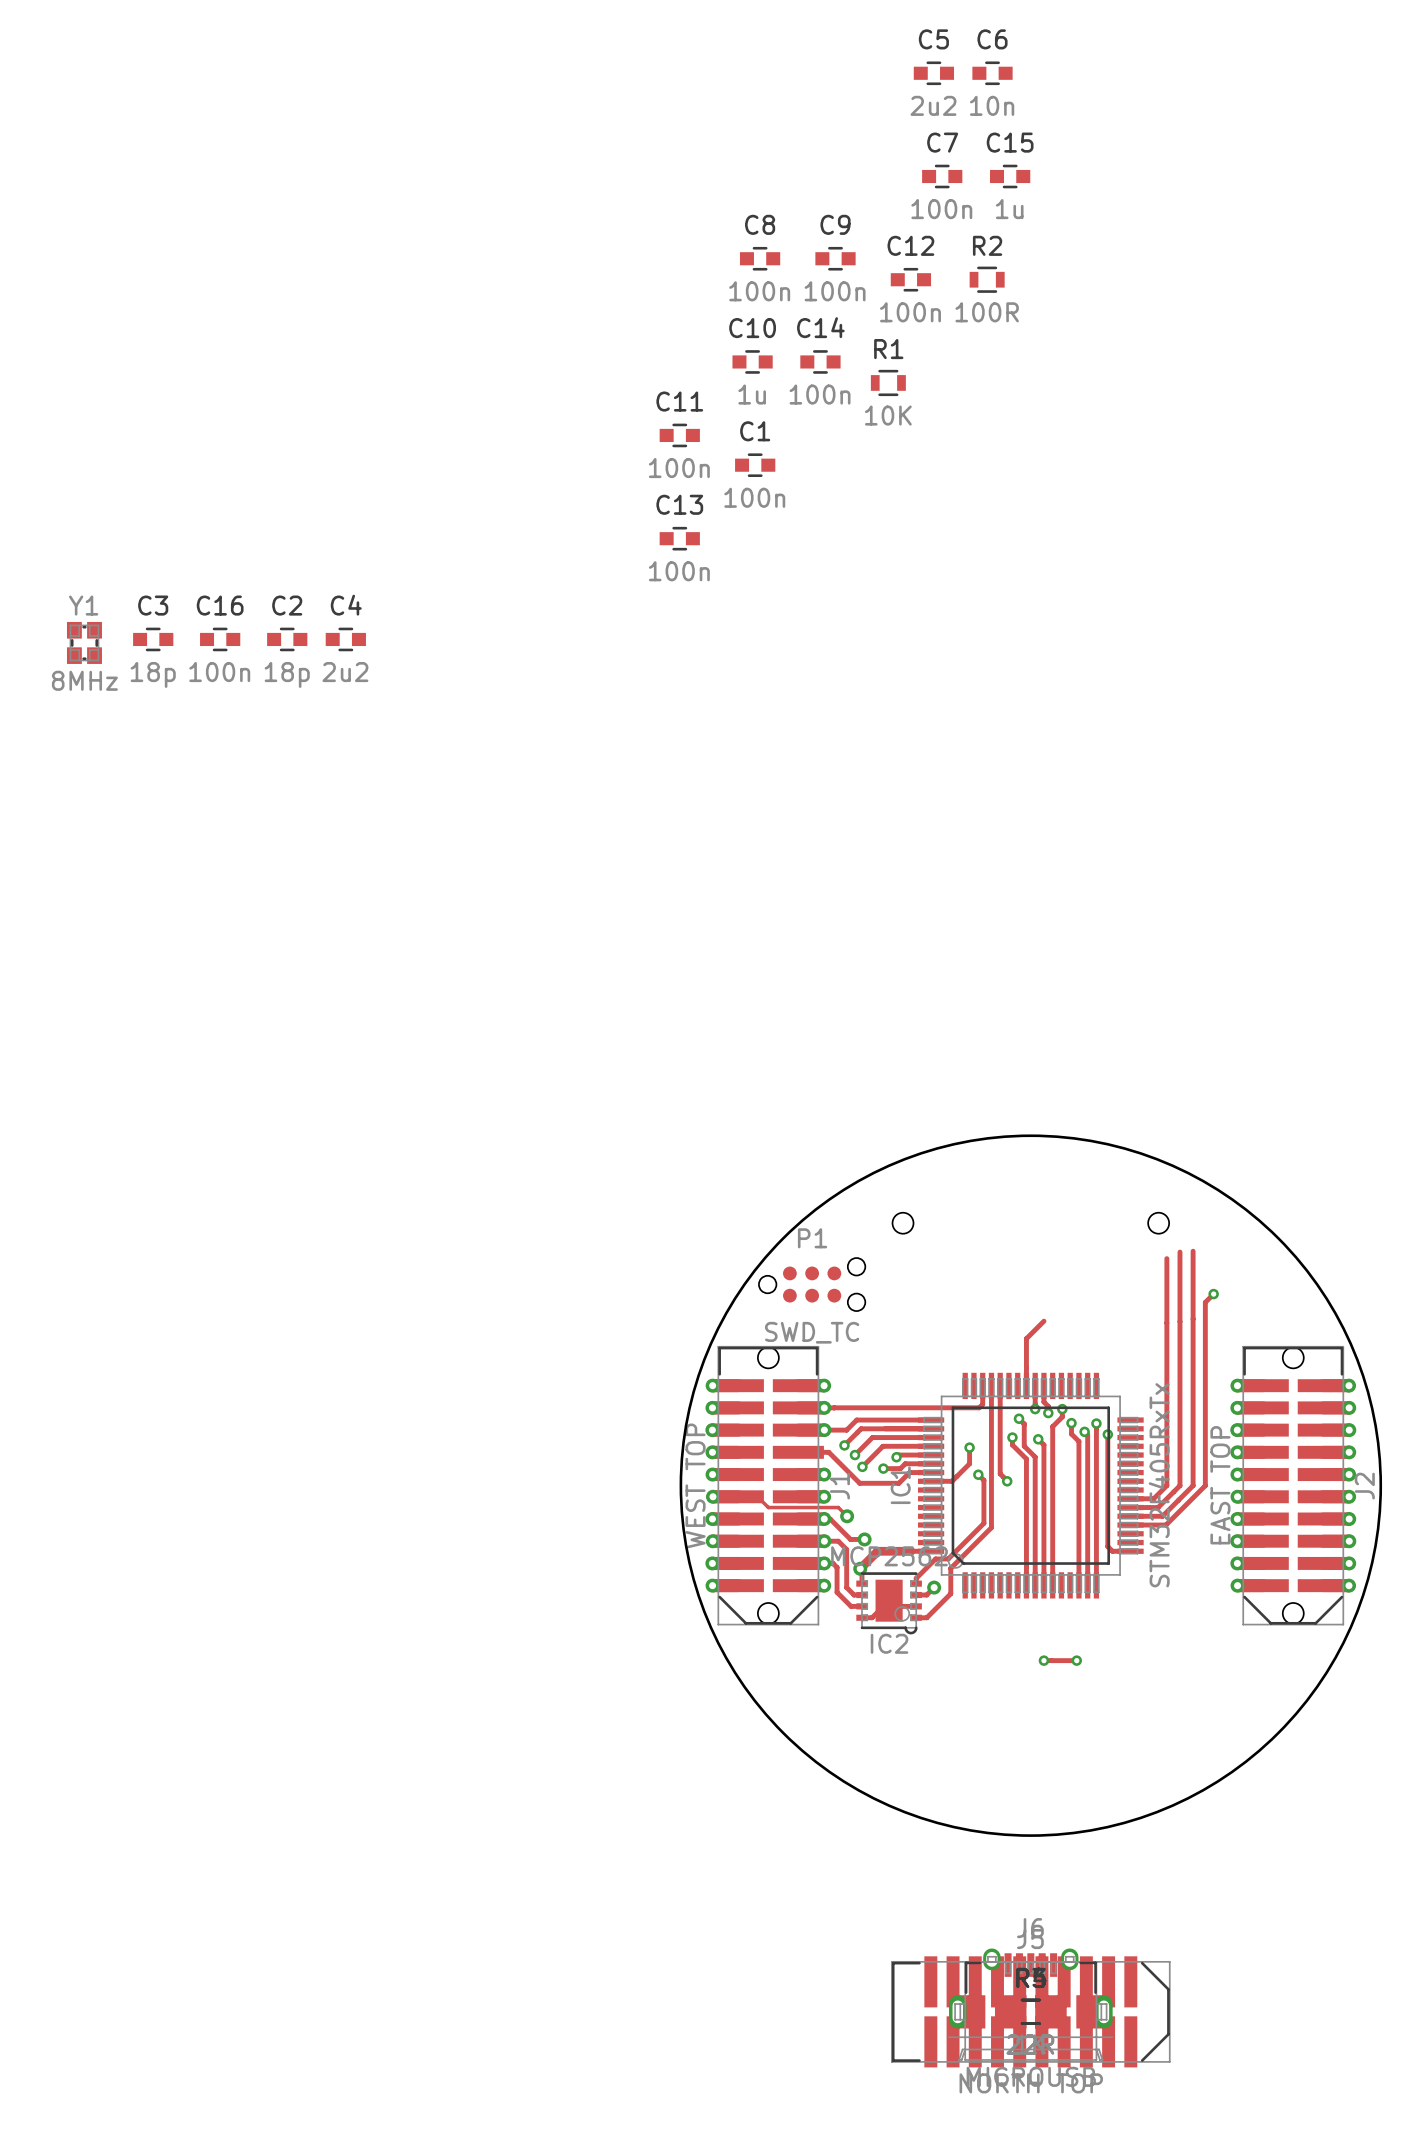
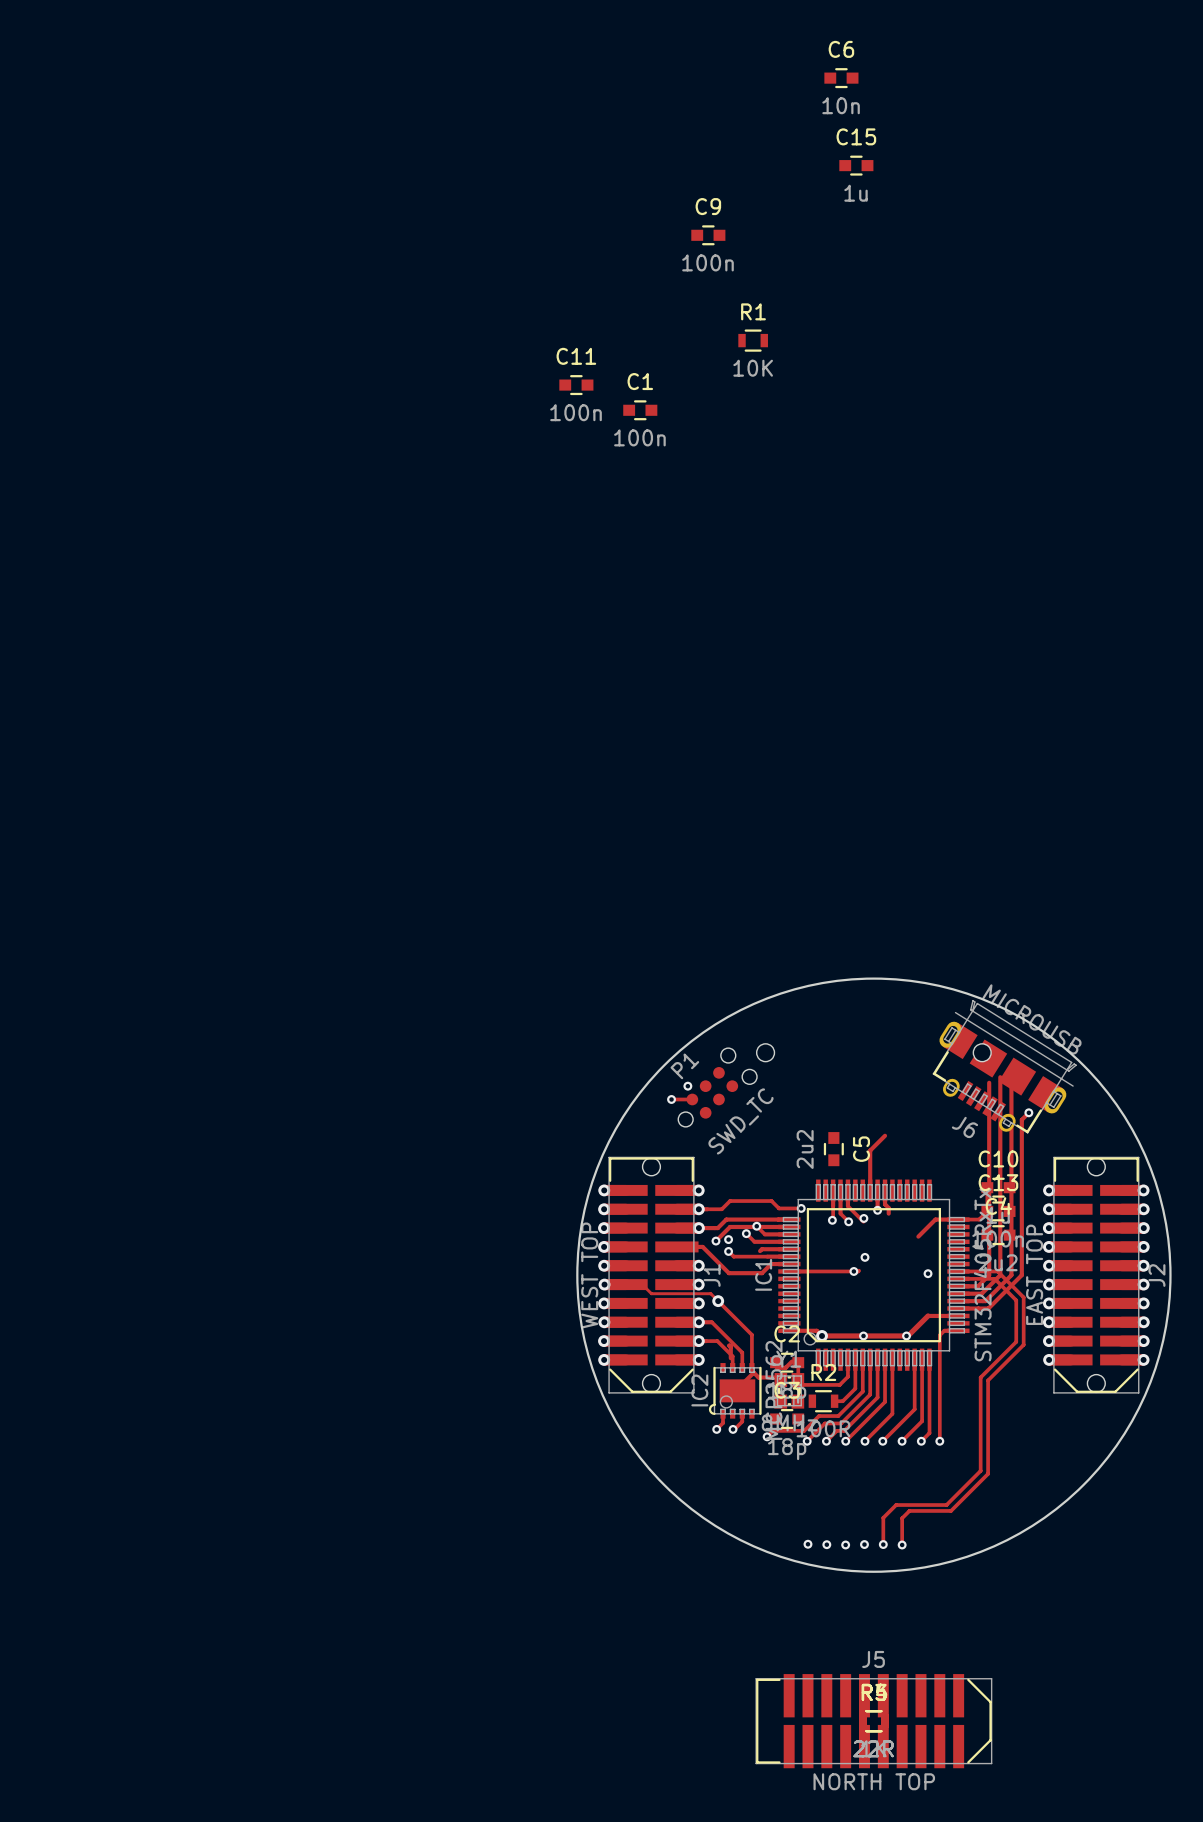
C5 rotation: 0° (933, 73) -> 90° clockwise (833, 1149)
C5 position: (933, 73) -> (833, 1149)
C7: 100n (942, 176) -> none
C8: 100n (760, 258) -> none
C12: 100n (910, 279) -> none
R2 position: (987, 279) -> (823, 1401)
C10 position: (752, 361) -> (998, 1187)
C14: 100n (820, 361) -> none
C13 position: (679, 538) -> (998, 1211)
C3 position: (153, 639) -> (787, 1419)
C16: 100n (220, 639) -> none
C2 position: (287, 639) -> (787, 1362)
C4 position: (345, 639) -> (998, 1235)
Y1 position: (84, 642) -> (789, 1390)
via: none -> (687, 1086)
track: none -> (671, 1099) (692, 1099)
via: none -> (671, 1099)
P1 rotation: 0° (812, 1284) -> 45° counterclockwise (717, 1087)
track: none -> (987, 1187) (987, 1211) (979, 1219) (935, 1219) (918, 1236)
track: (982, 1404) (979, 1407) (834, 1407) -> (801, 1208) (778, 1208) (771, 1201) (730, 1201) (721, 1209) (707, 1209)
track: none -> (833, 1206) (832, 1220)
track: (1000, 1404) (1000, 1473) (1007, 1481) -> (847, 1206) (863, 1221)
via: none -> (801, 1208)
track: (1062, 1409) (1062, 1417) (1052, 1426) (1052, 1585) -> (865, 1441) (892, 1413) (892, 1359)
via: (1062, 1409) -> none
track: (991, 1413) (991, 1527) (950, 1568) (950, 1593) (926, 1617) (916, 1617) -> (840, 1213) (848, 1221)
via: (1048, 1413) -> none
track: (1019, 1418) (1024, 1423) (1024, 1446) (1035, 1457) (1035, 1585) -> (826, 1441) (836, 1430) (844, 1430) (877, 1397) (877, 1359)
via: none -> (832, 1220)
via: none -> (848, 1221)
track: (1071, 1423) (1071, 1434) (1078, 1441) (1078, 1585) -> (882, 1441) (914, 1409) (914, 1359)
via: (1071, 1423) -> none
track: (1096, 1423) (1096, 1585) -> (921, 1441) (929, 1433) (929, 1359)
via: (1096, 1423) -> none
via: none -> (756, 1226)
track: (1084, 1431) (1087, 1434) (1087, 1585) -> (902, 1441) (922, 1421) (922, 1359)
via: (1084, 1431) -> none
track: (1107, 1434) (1107, 1546) (1113, 1551) -> (939, 1441) (939, 1335) (944, 1330)
via: (1107, 1434) -> none
via: none -> (746, 1233)
track: (902, 1437) (872, 1437) (854, 1455) -> (764, 1234) (756, 1226)
track: (1012, 1437) (1012, 1444) (1026, 1458) (1026, 1585) -> (807, 1441) (824, 1423) (841, 1423) (870, 1394) (870, 1359)
via: (1012, 1437) -> none
track: (1038, 1439) (1043, 1444) (1043, 1585) -> (845, 1441) (885, 1401) (885, 1359)
via: (1038, 1439) -> none
via: none -> (728, 1239)
track: (889, 1446) (882, 1446) (862, 1466) -> (754, 1241) (746, 1233)
track: (969, 1447) (969, 1463) (952, 1481) -> (859, 1270) (807, 1271)
via: (969, 1447) -> none
via: (854, 1455) -> none
via: none -> (728, 1251)
via: (896, 1457) -> none
track: (905, 1463) (900, 1468) (883, 1468) -> (767, 1256) (733, 1256) (728, 1251)
via: none -> (865, 1257)
via: (862, 1466) -> none
via: (883, 1468) -> none
track: (978, 1474) (983, 1480) (983, 1523) (948, 1558) (935, 1558) (916, 1578) (916, 1583) (918, 1583) -> none
via: (978, 1474) -> none
track: none -> (958, 1271) (997, 1271) (1023, 1297) (1023, 1344) (988, 1380) (988, 1473) (951, 1510) (909, 1510) (902, 1518) (902, 1544)
via: none -> (928, 1273)
track: none -> (958, 1278) (994, 1278) (1016, 1300) (1016, 1341) (980, 1377) (980, 1470) (946, 1505) (896, 1505) (883, 1517) (883, 1544)
track: (826, 1518) (830, 1518) (850, 1539) (864, 1539) -> none
track: none -> (715, 1303) (718, 1301) (751, 1334) (751, 1367)
via: (864, 1539) -> none
track: (838, 1541) (846, 1549) (846, 1587) (854, 1595) (861, 1595) -> (710, 1322) (742, 1352) (742, 1367)
track: (931, 1551) (877, 1551) (860, 1568) -> (789, 1330) (816, 1330) (822, 1335) (907, 1336) (928, 1315) (958, 1315)
via: none -> (863, 1335)
via: none -> (906, 1335)
track: (833, 1563) (837, 1567) (837, 1592) (851, 1606) (861, 1606) -> (706, 1341) (717, 1341) (732, 1356) (732, 1367)
via: (860, 1568) -> none
track: none -> (847, 1359) (847, 1376) (839, 1384) (802, 1384) (797, 1380) (798, 1362)
track: none -> (855, 1359) (855, 1388) (842, 1401) (834, 1401)
track: none -> (862, 1359) (862, 1391) (838, 1416) (819, 1416) (804, 1430) (773, 1430) (767, 1436)
via position: (934, 1587) -> (822, 1335)
IC2 rotation: 0° (889, 1603) -> 90° clockwise (735, 1390)
track: none -> (723, 1413) (723, 1423) (716, 1429)
track: none -> (742, 1413) (742, 1421) (733, 1429)
track: (1043, 1660) (1076, 1660) -> none
via: (1043, 1660) -> none
via: (1076, 1660) -> none
via: none -> (716, 1429)
via: none -> (733, 1429)
via: none -> (751, 1429)
via: none -> (767, 1436)
via: none -> (807, 1441)
via: none -> (826, 1441)
via: none -> (845, 1441)
via: none -> (865, 1441)
via: none -> (882, 1441)
via: none -> (902, 1441)
via: none -> (921, 1441)
via: none -> (939, 1441)
via: none -> (807, 1544)
via: none -> (826, 1544)
via: none -> (864, 1544)
via: none -> (883, 1544)
via: none -> (845, 1544)
via: none -> (902, 1544)
J6 rotation: 0° (1030, 2004) -> 148° counterclockwise (1004, 1066)
J6 position: (1030, 2004) -> (1004, 1066)

